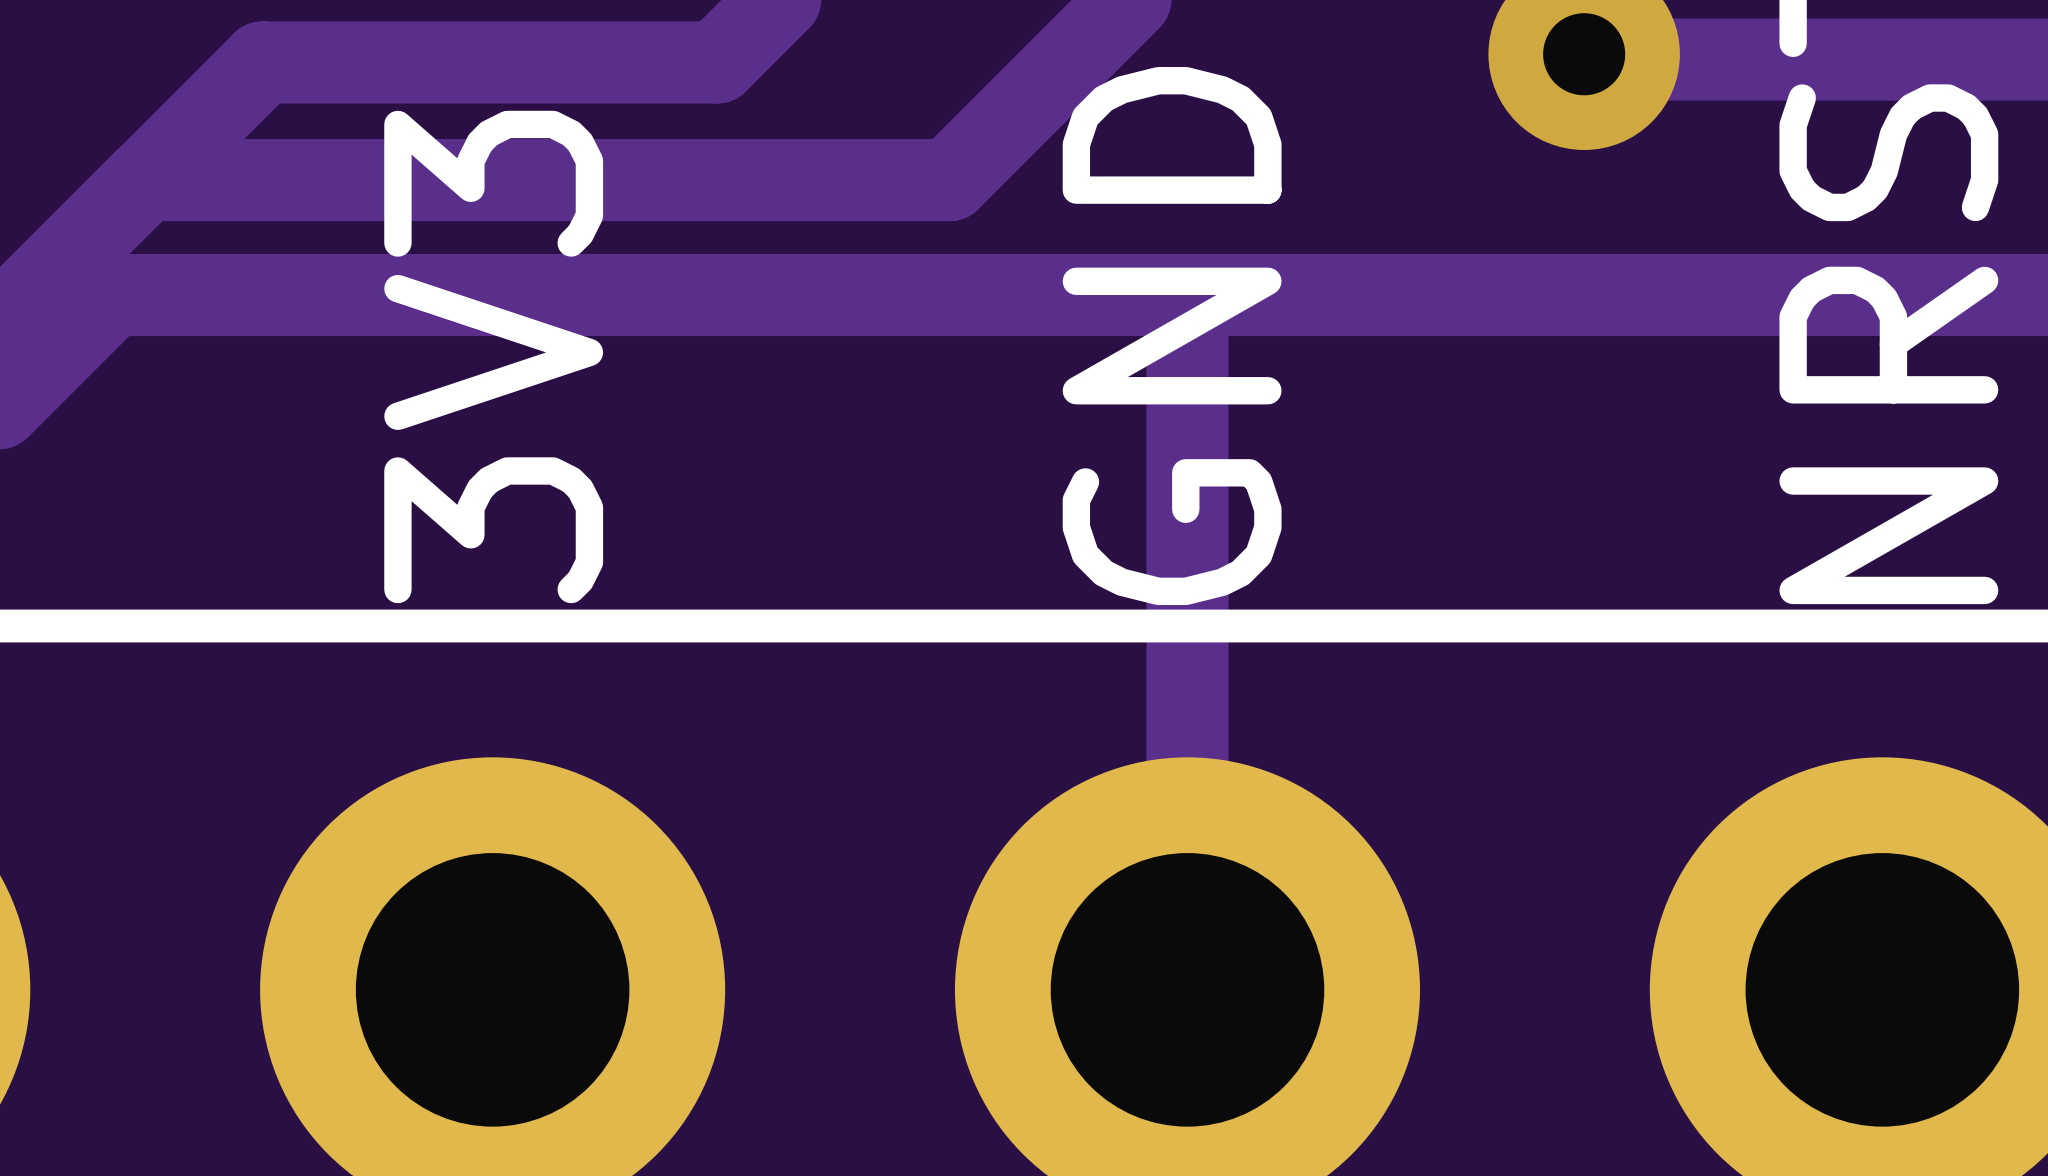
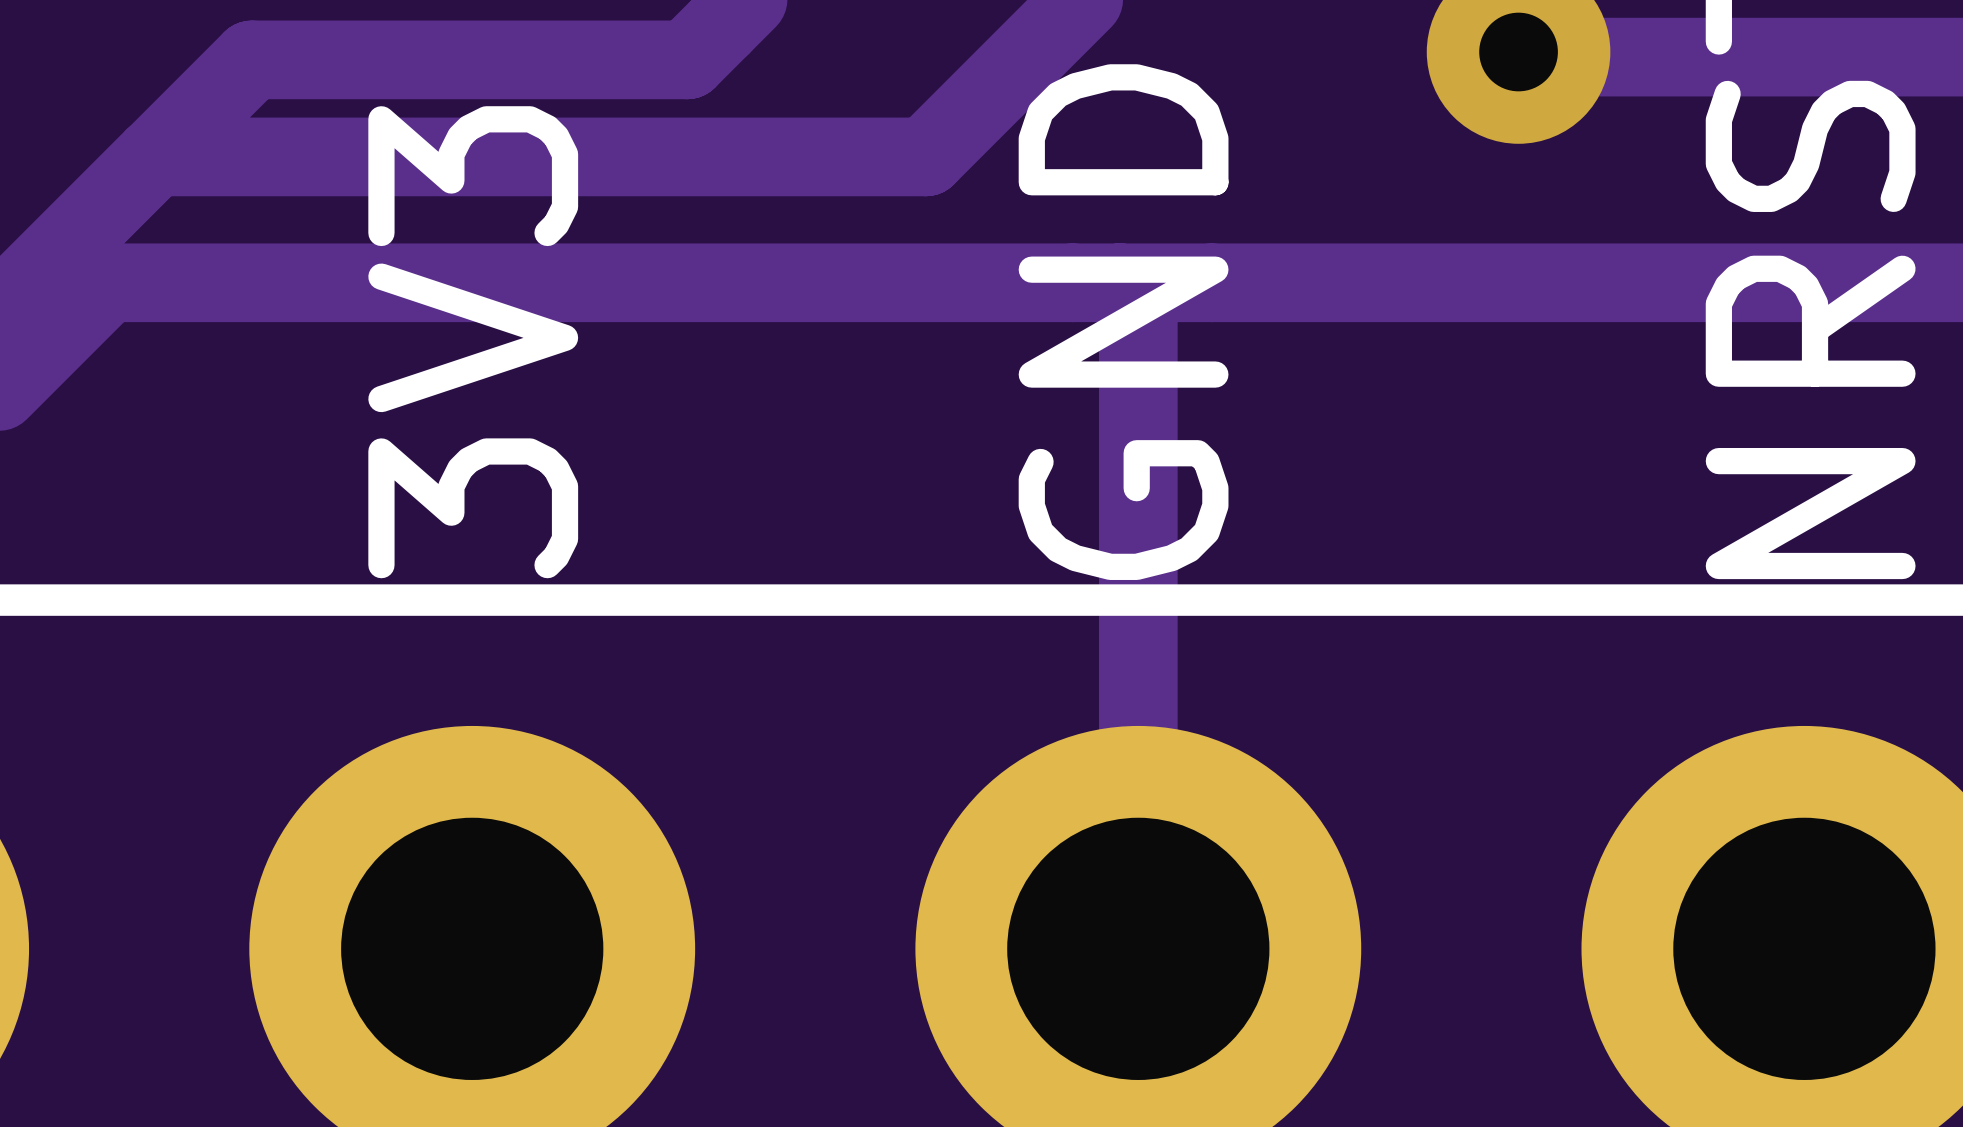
track: (965, 163) (949, 180) (145, 180) -> (925, 156) (154, 156)

